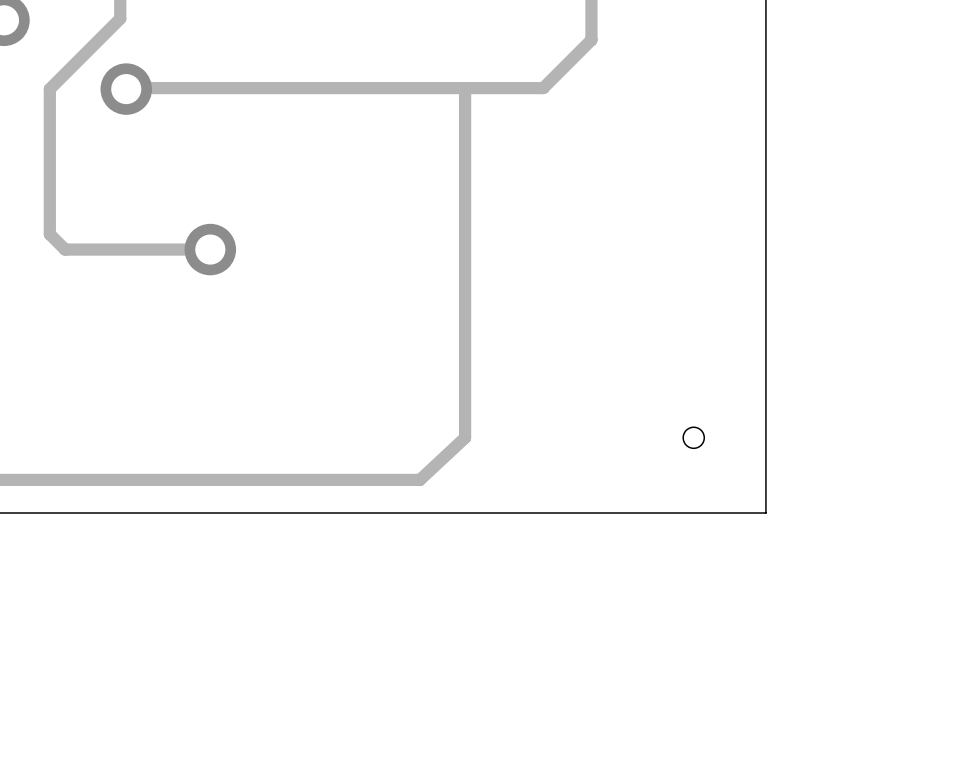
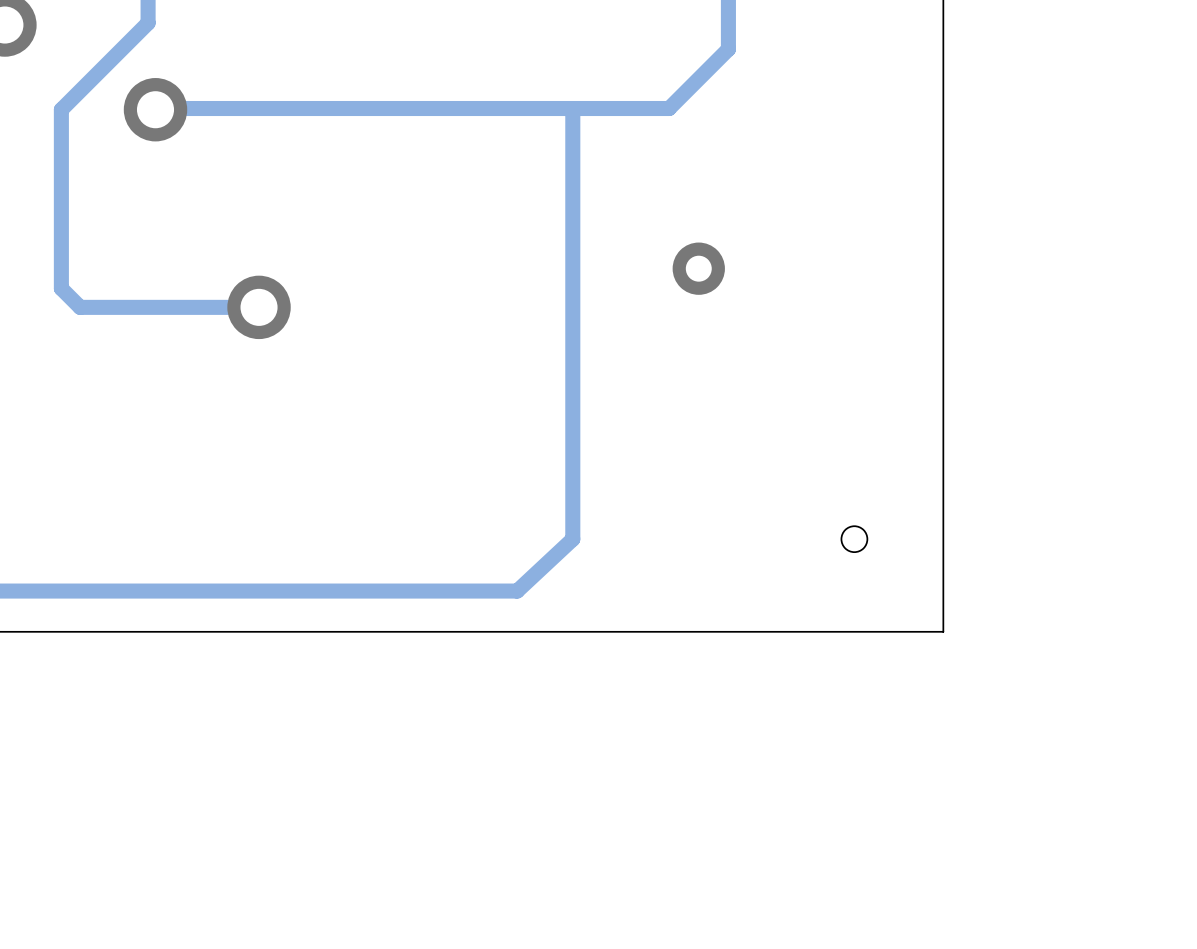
via: none -> (698, 268)

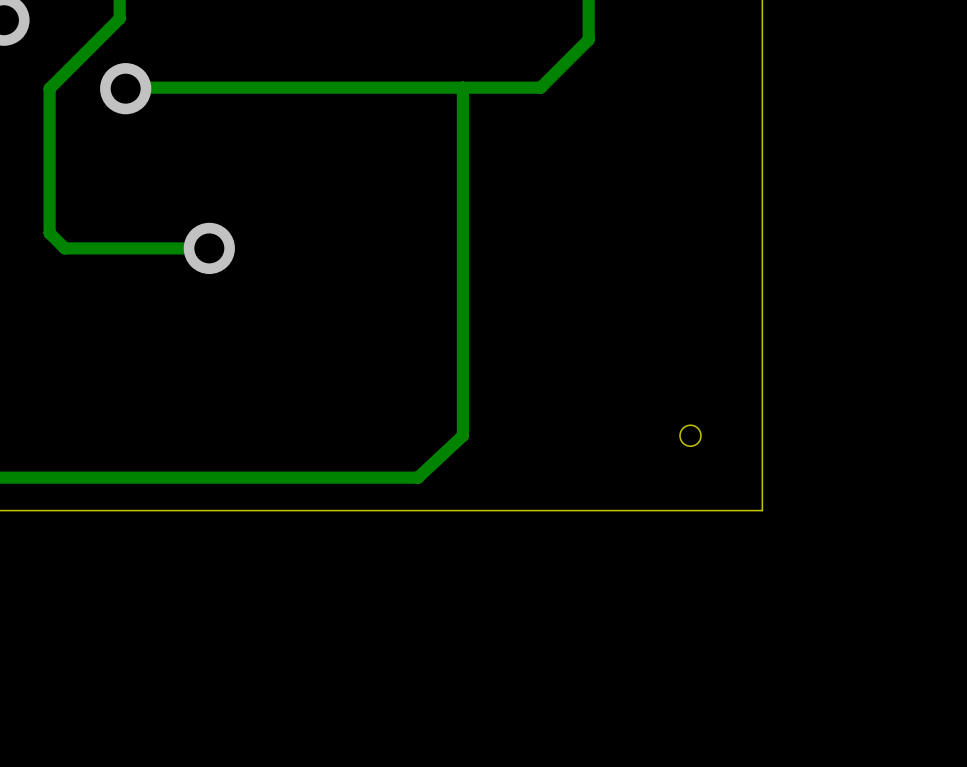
via: (698, 268) -> none

